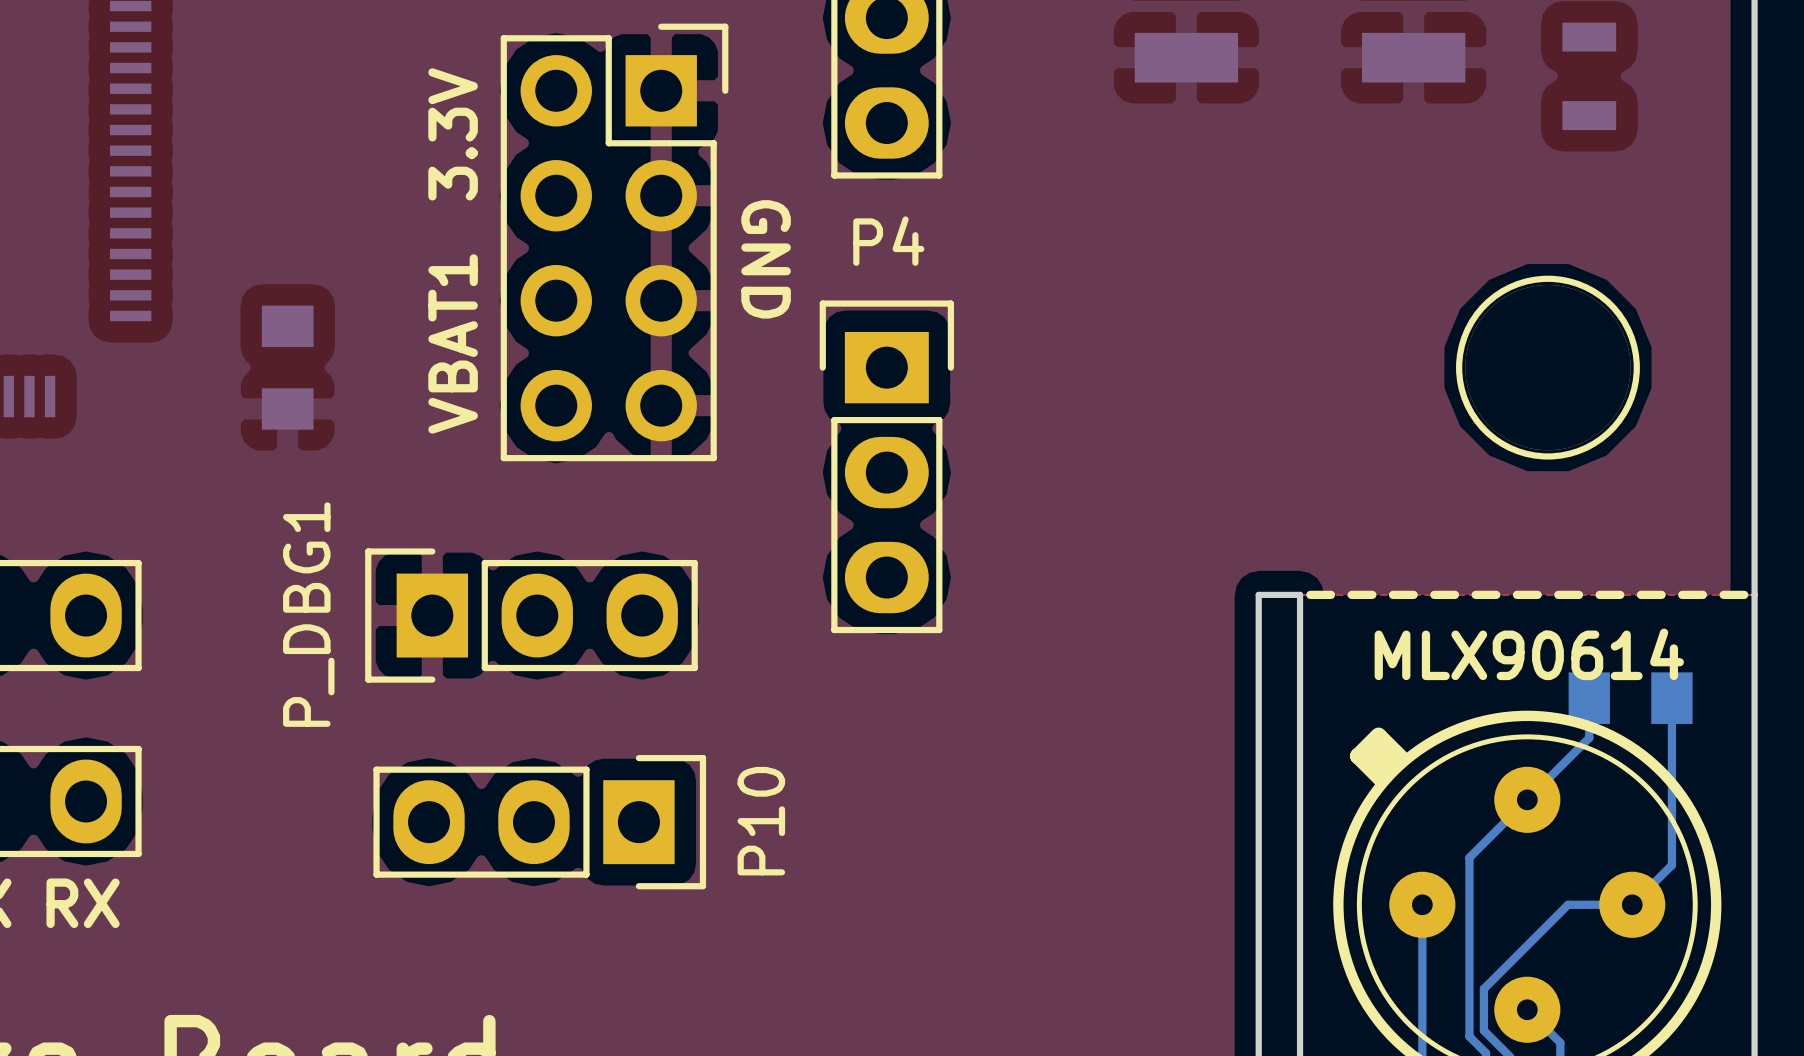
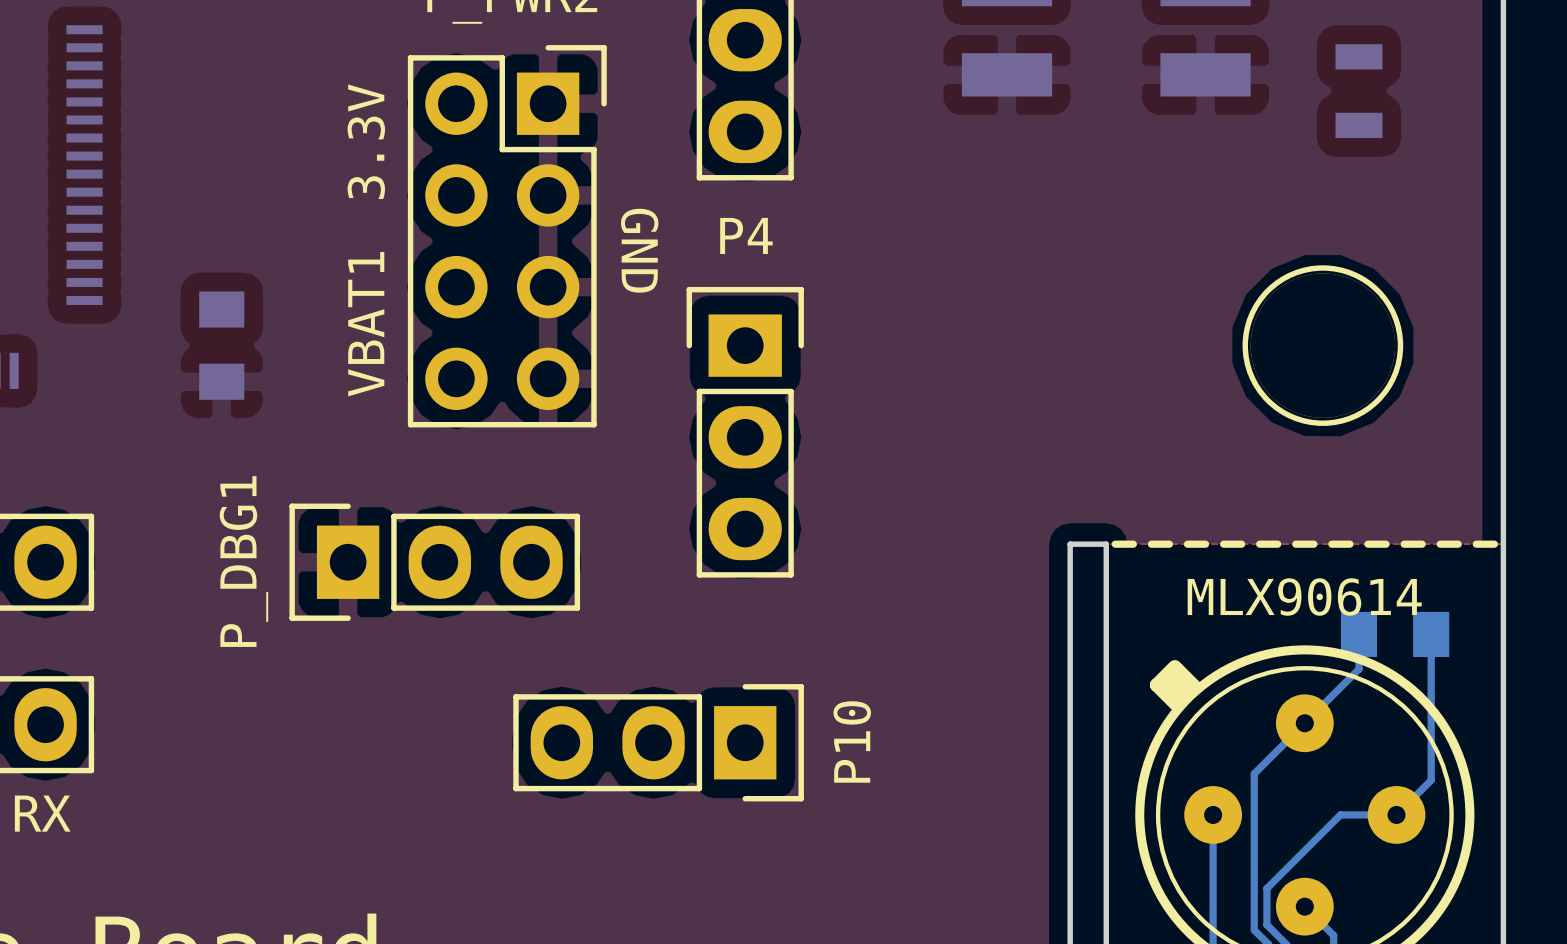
P10 position: (539, 822) -> (658, 742)

